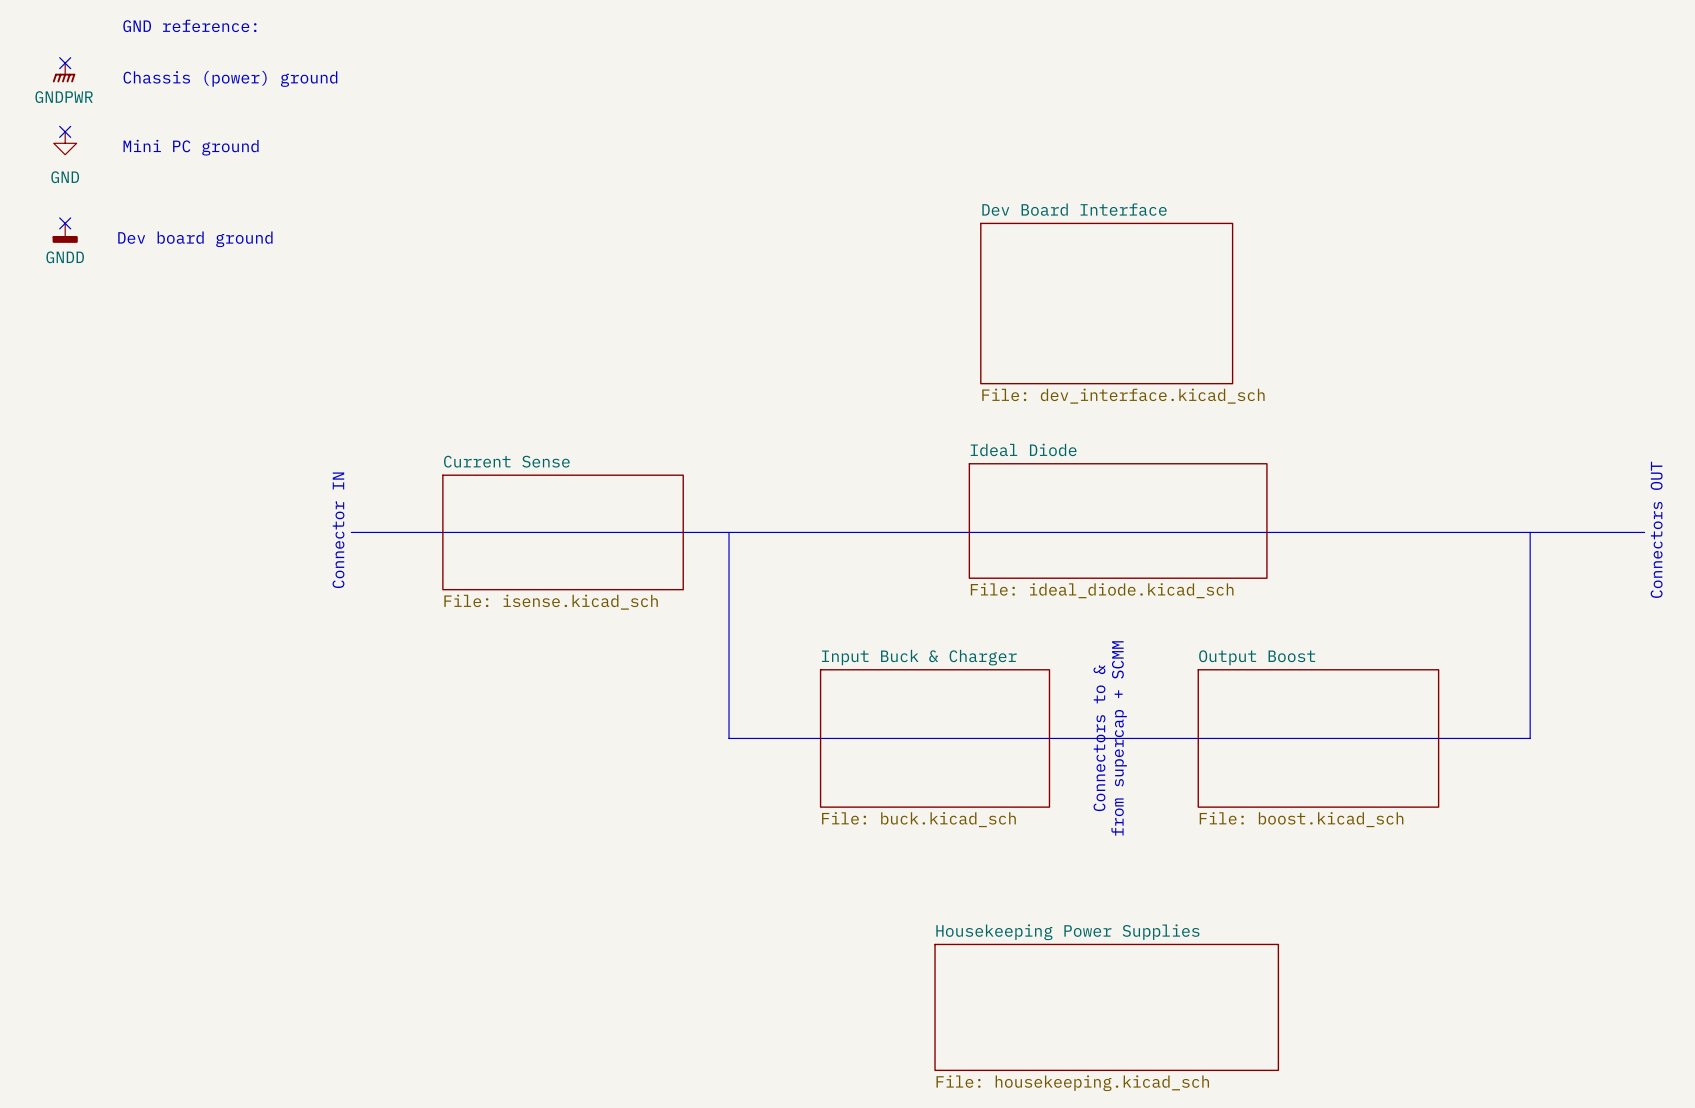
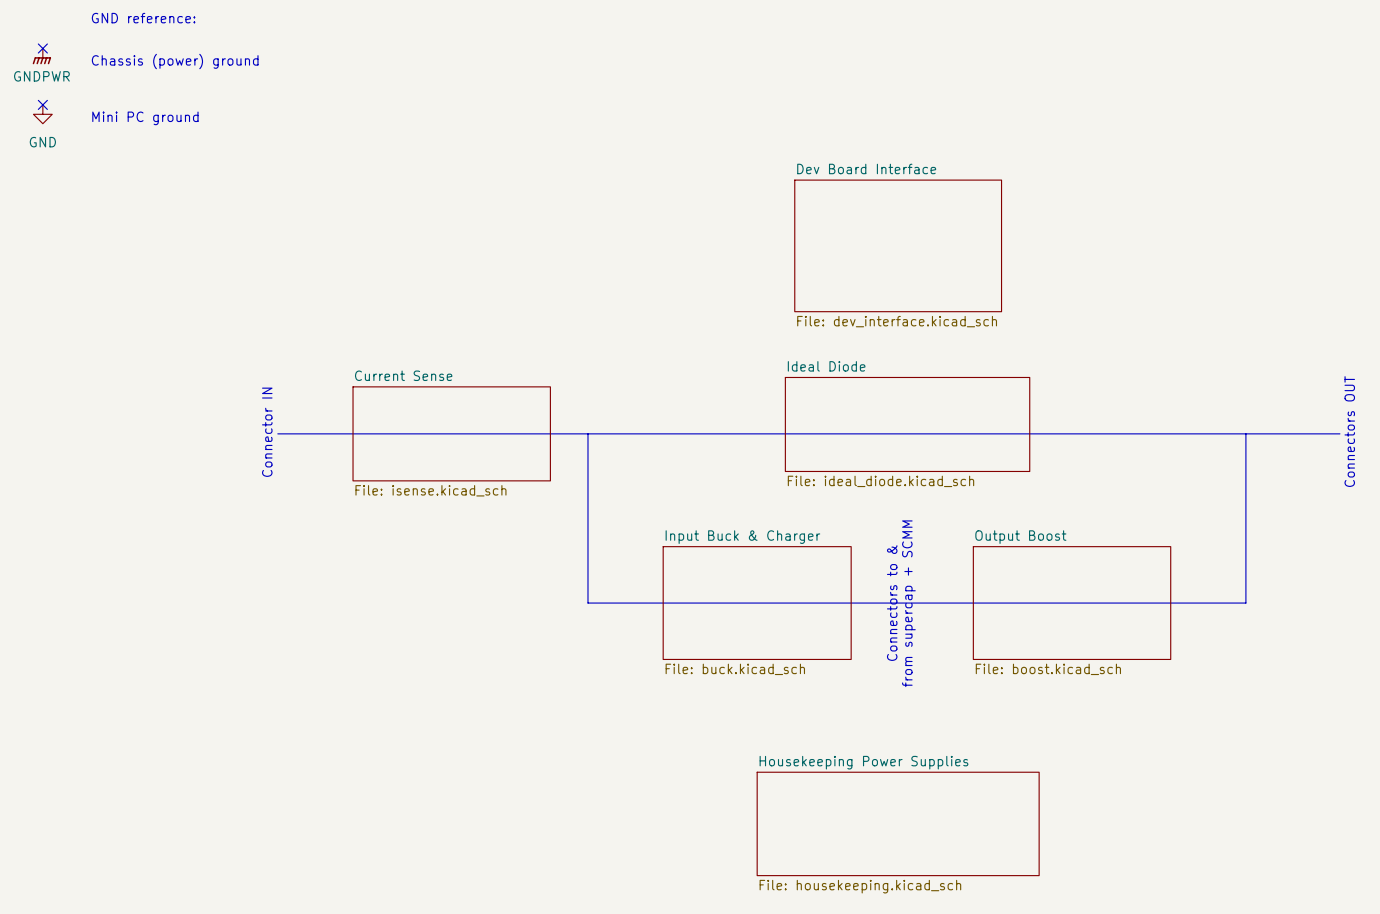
no-connect mark: (65, 223) -> none
power symbol: GNDD (65, 233) -> none
text: Dev board ground (195, 239) -> none

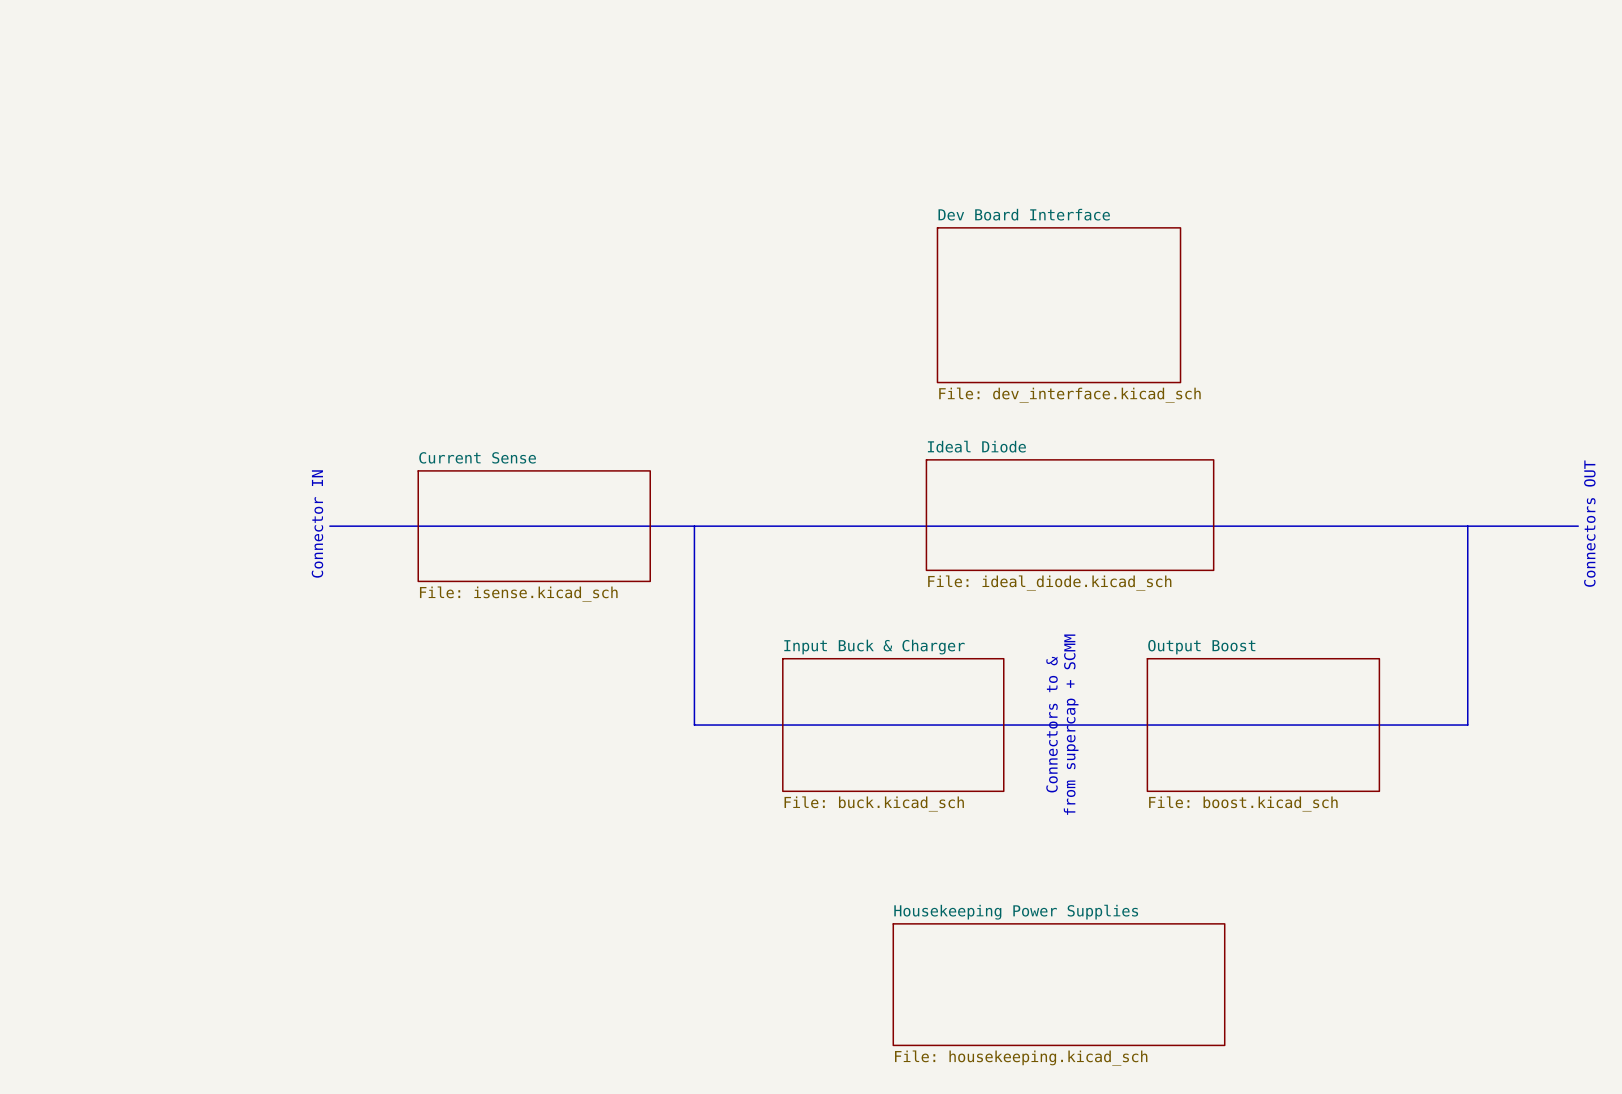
text: GND reference: (143, 18) -> none
no-connect mark: (42, 48) -> none
power symbol: GNDPWR (41, 56) -> none
text: Chassis (power) ground (175, 61) -> none
no-connect mark: (42, 104) -> none
power symbol: GND (42, 114) -> none
text: Mini PC ground (145, 118) -> none

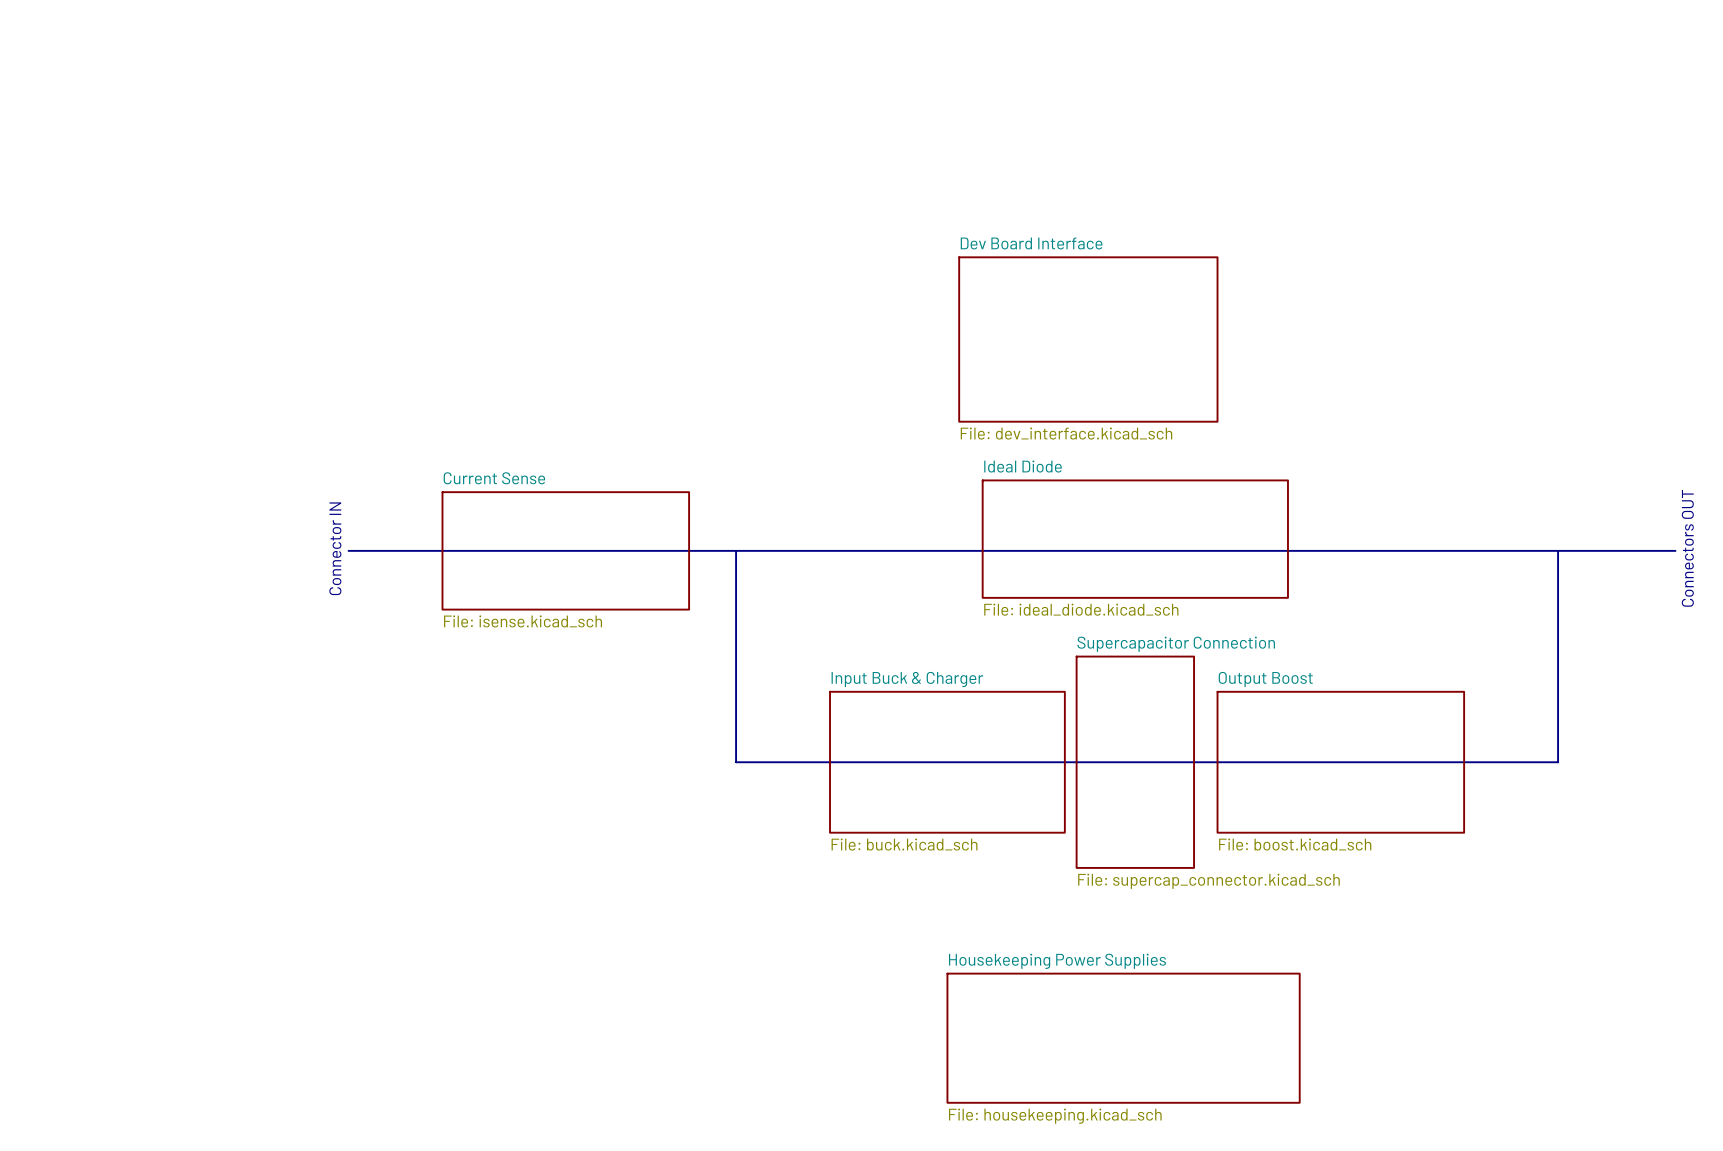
sheet Dev Board Interface position: (1059, 305) -> (1088, 339)
text: Connectors to & (1052, 724) -> none
text: from supercap + SCMM (1071, 724) -> none
sheet Supercapacitor Connection: none -> File: supercap_connector.kicad_sch (1135, 762)

